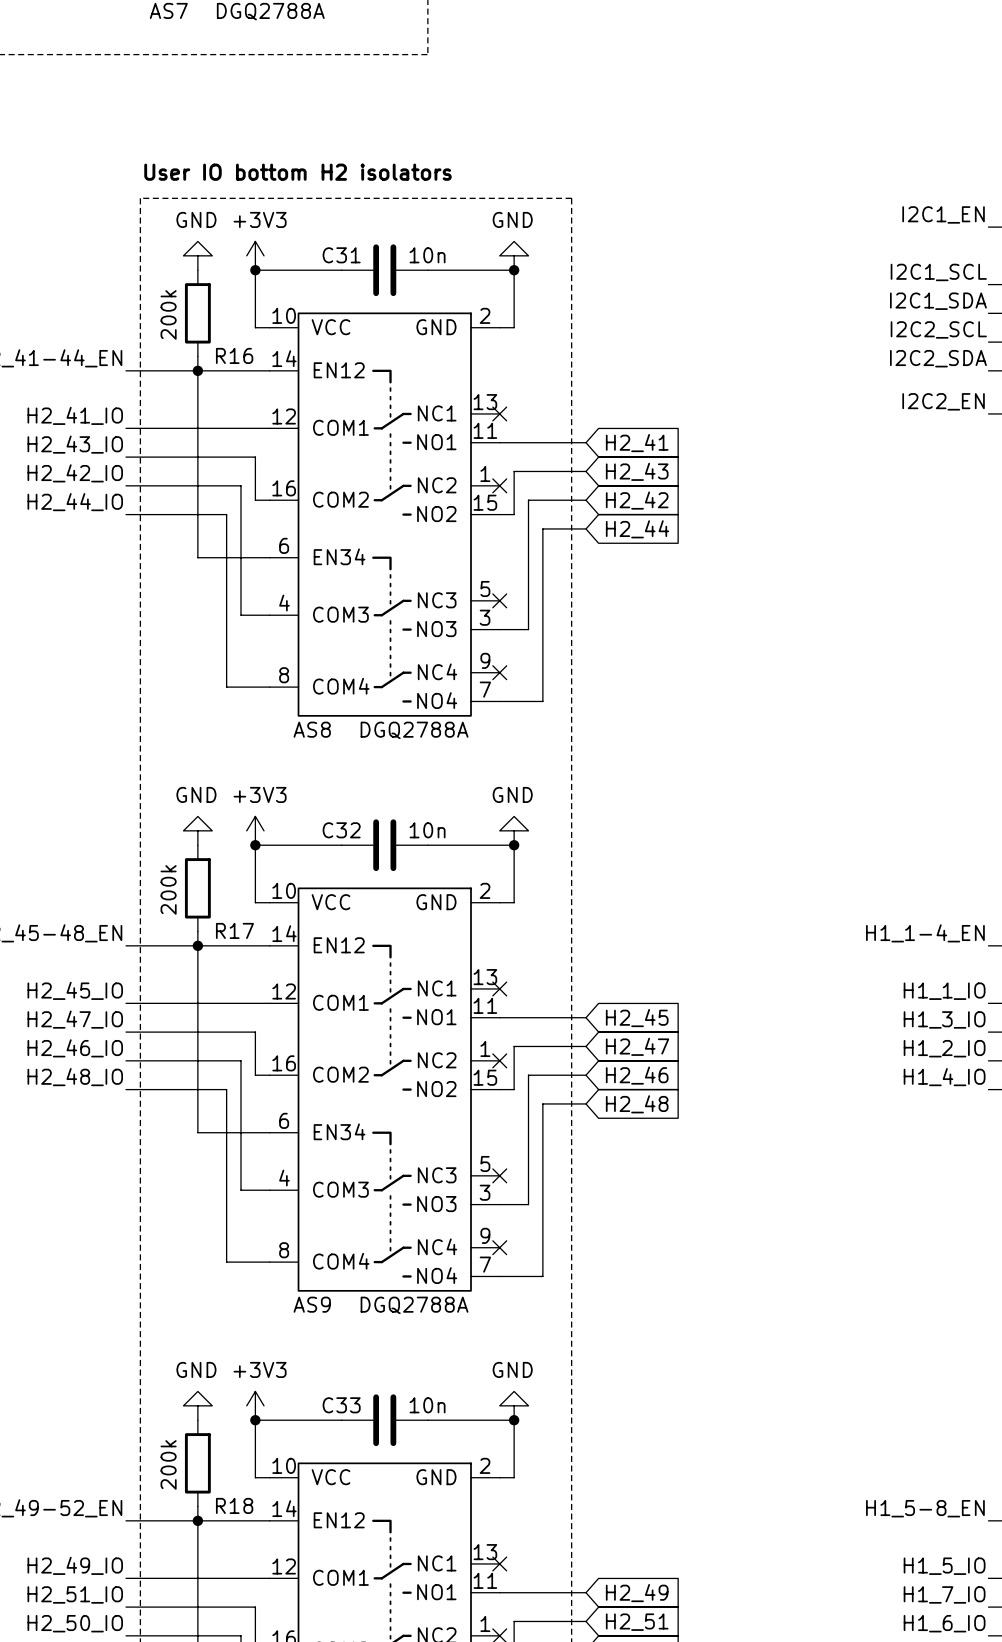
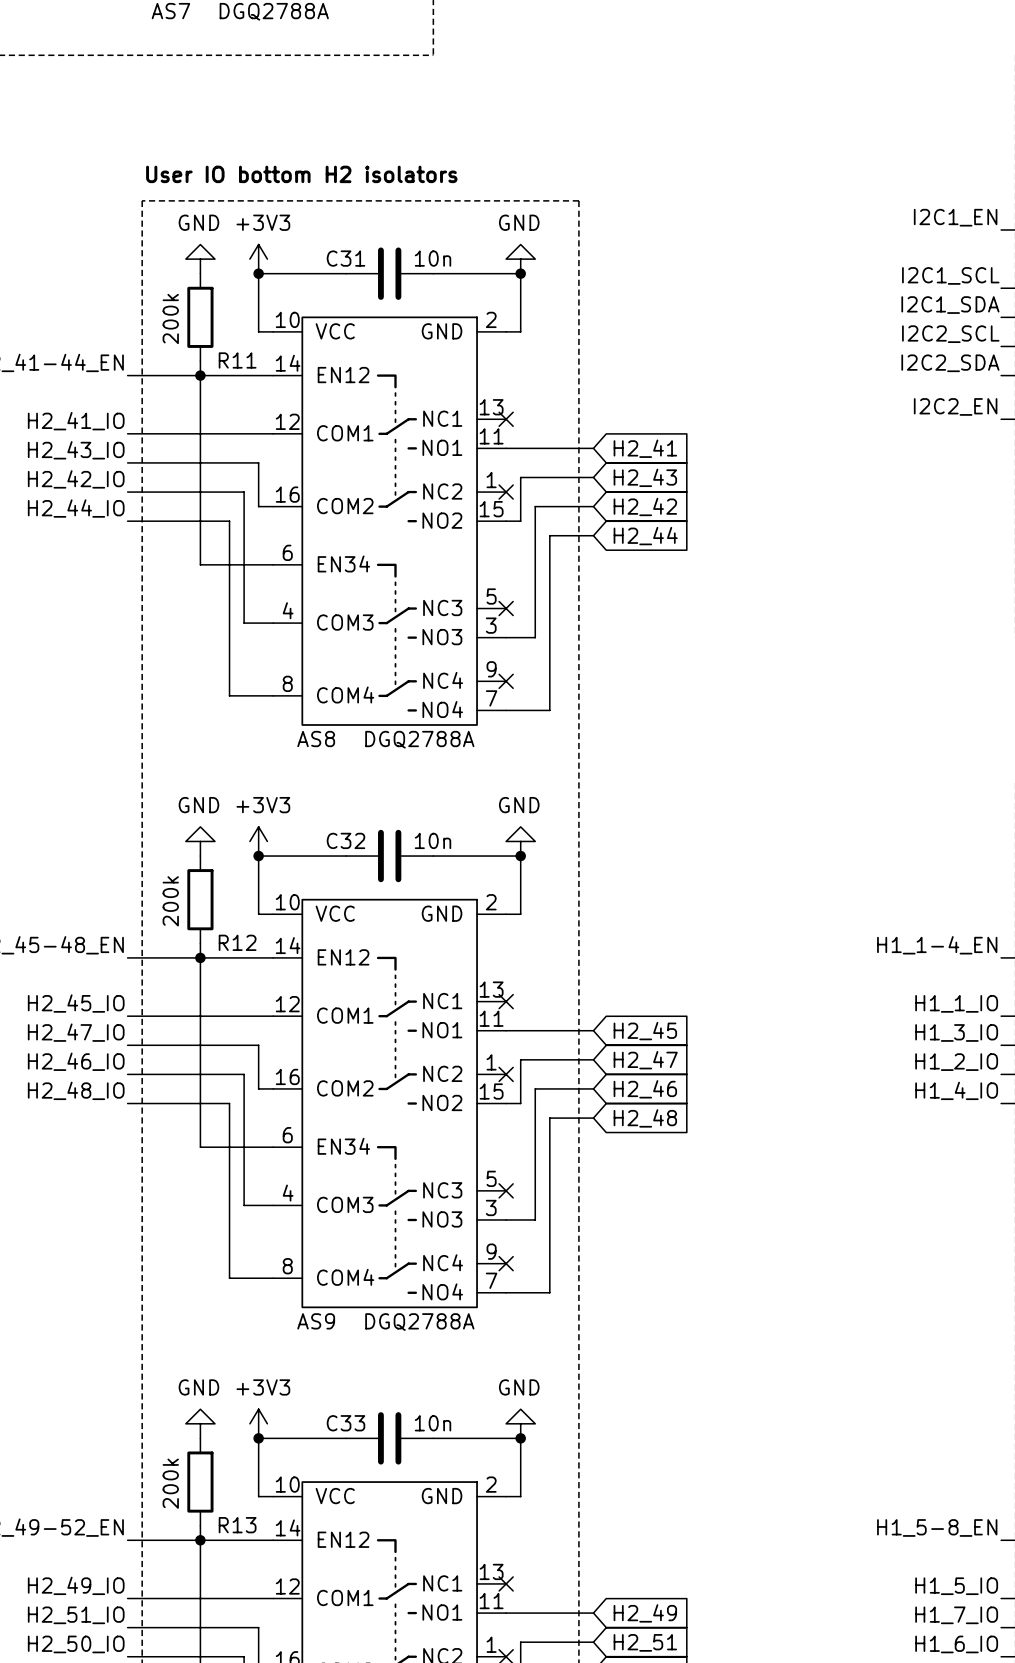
R16 name: R16 (234, 355) -> R11 (237, 360)
R17 name: R17 (234, 930) -> R12 (237, 942)
R18 name: R18 (234, 1505) -> R13 (237, 1525)

